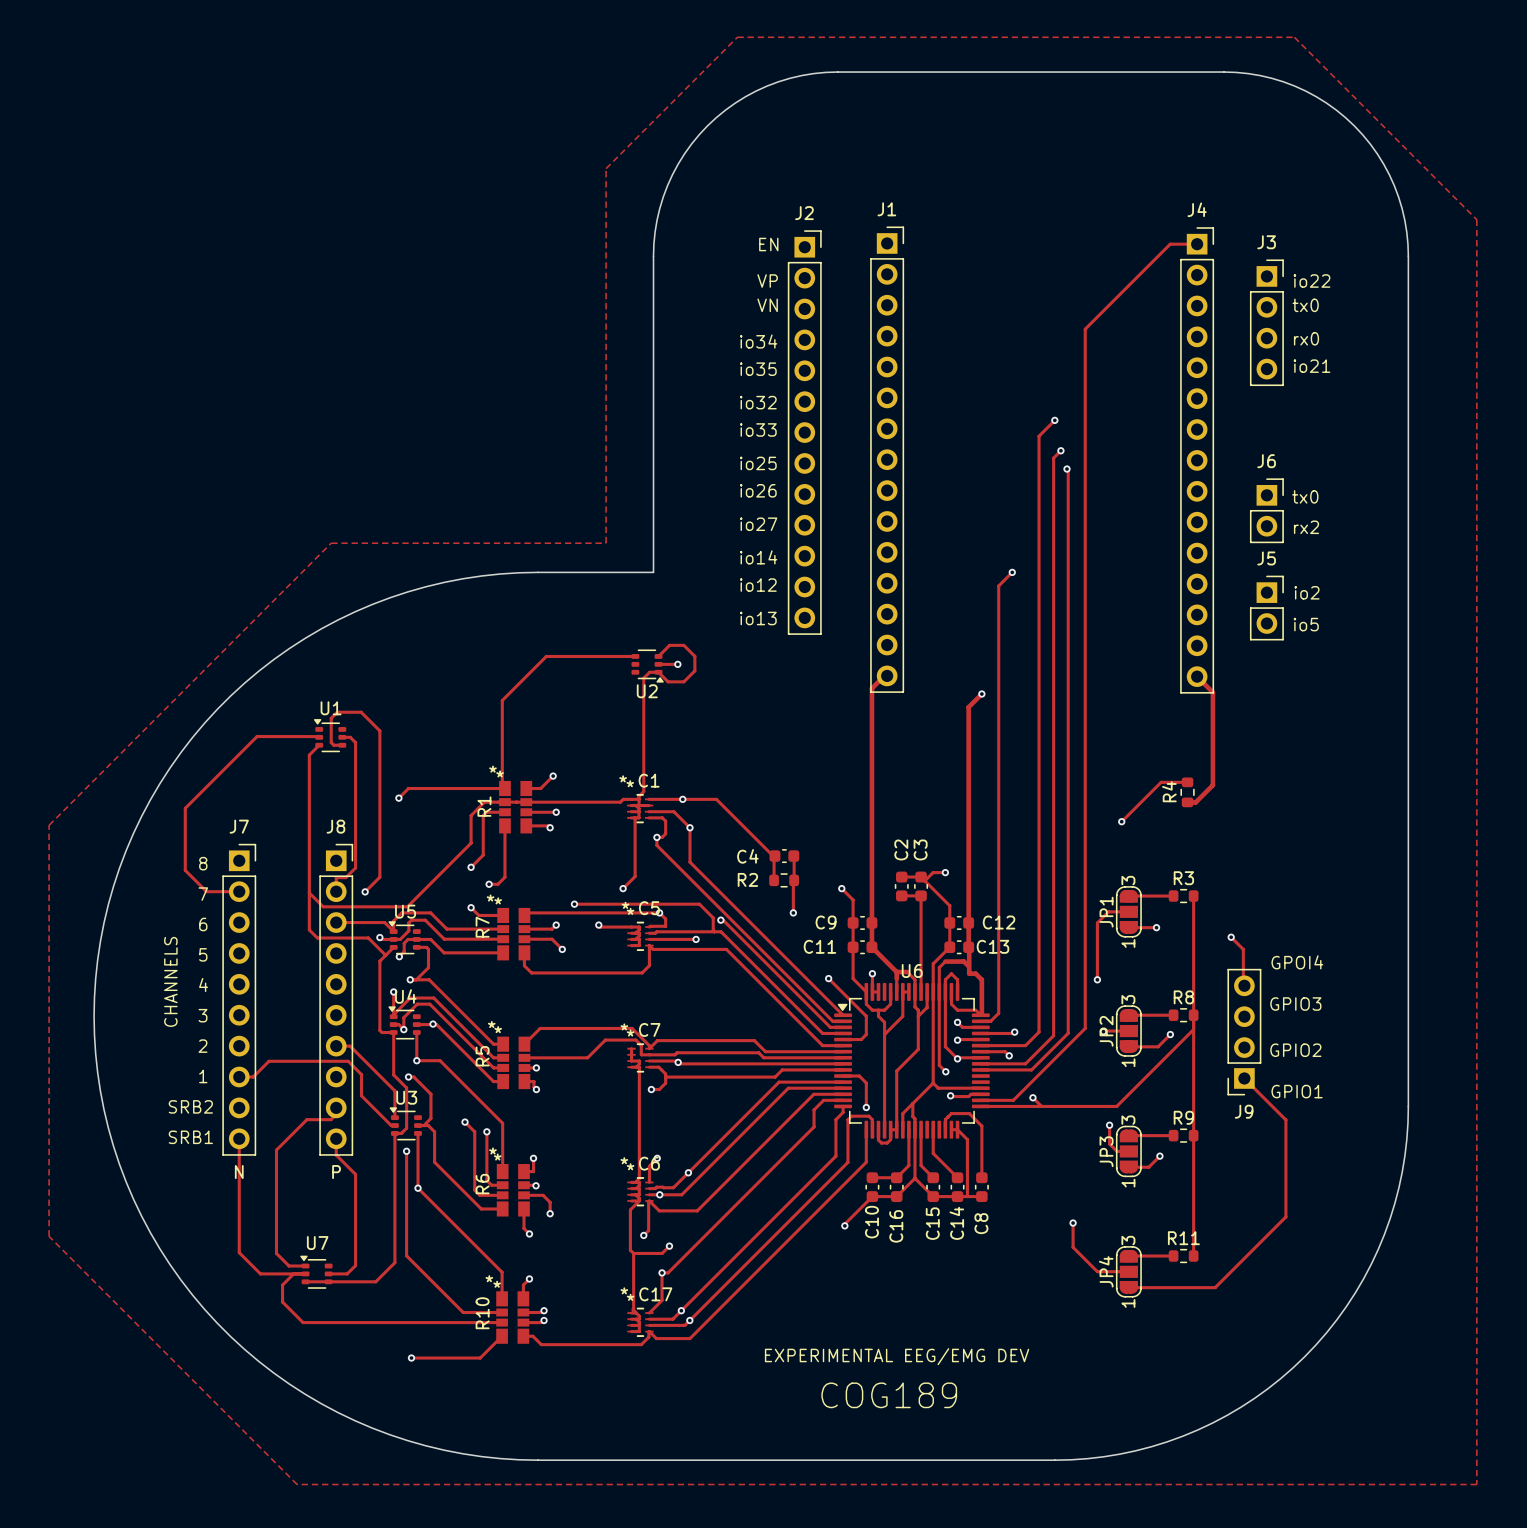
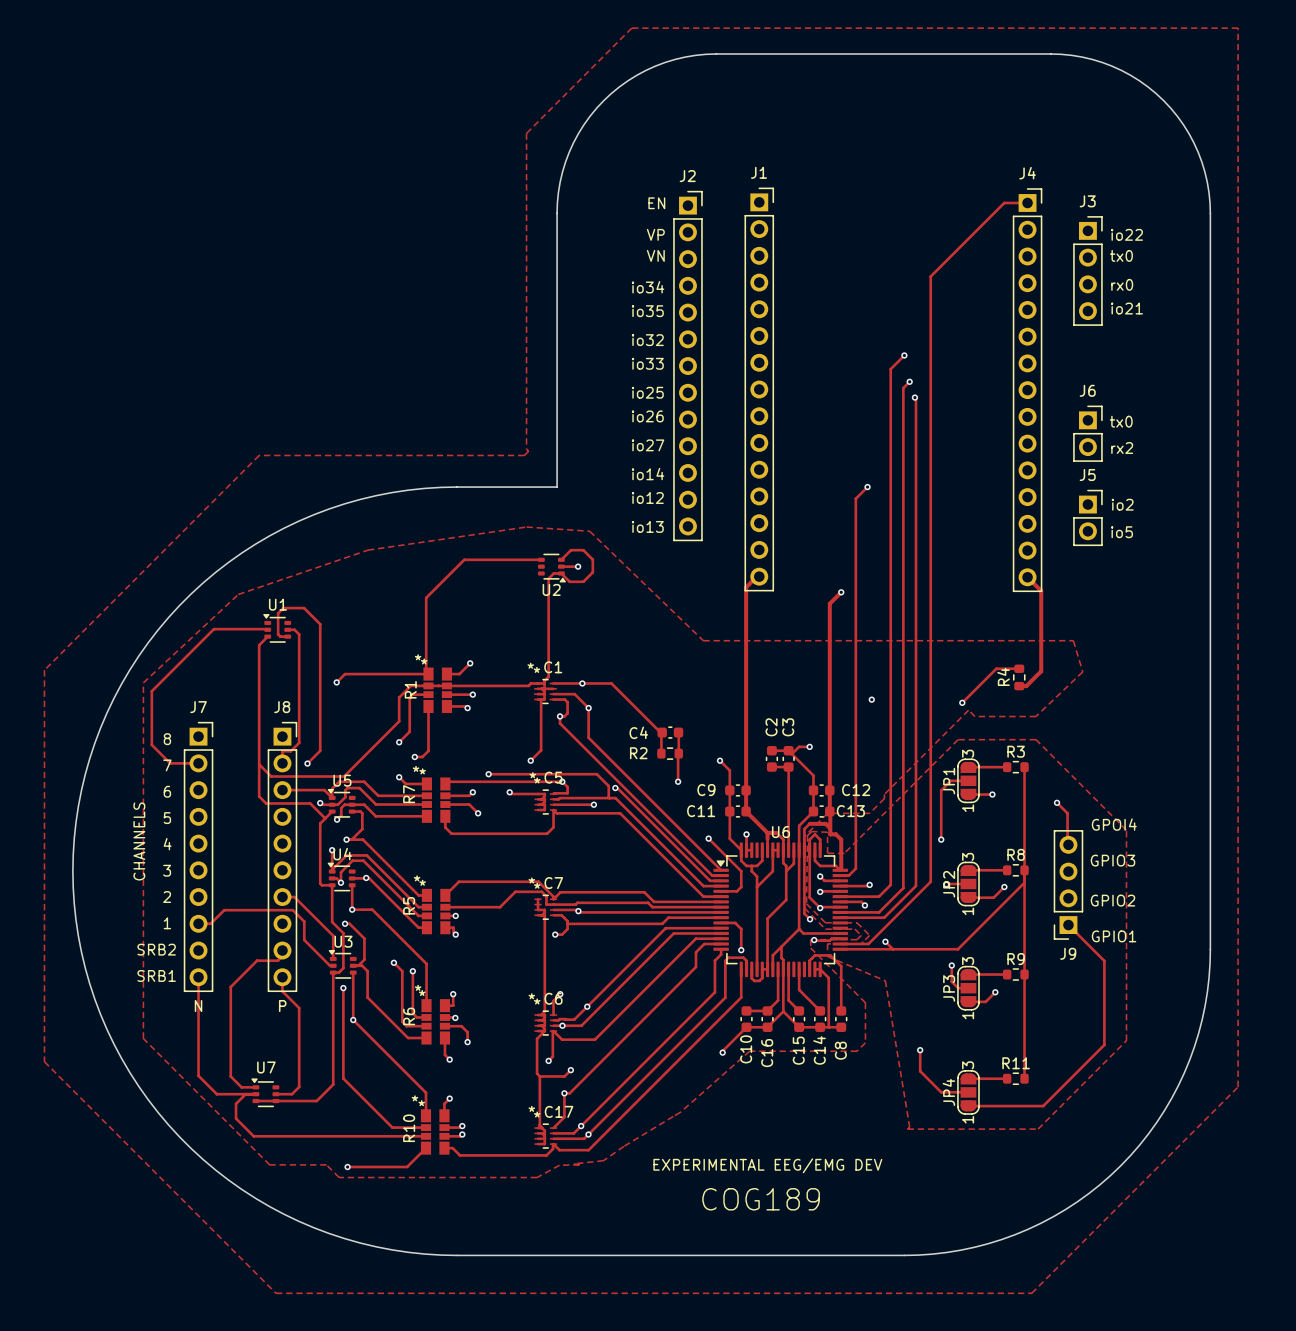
zone outline: (737, 37) (606, 168) (606, 543) (331, 543) (49, 825) (49, 1236) (297, 1484) (1476, 1484) (1476, 219) (1294, 37) (737, 37) -> (631, 28) (526, 133) (526, 449) (528, 451) (524, 455) (259, 455) (44, 670) (44, 1061) (276, 1293) (1031, 1293) (1238, 1087) (1238, 28) (631, 28)
zone outline: none -> (526, 527) (368, 550) (238, 594) (143, 682) (143, 1038) (269, 1164) (326, 1164) (339, 1177) (537, 1177) (559, 1165) (579, 1164) (573, 1163) (603, 1160) (680, 1112) (749, 1051) (857, 1051) (865, 1042) (865, 1002) (810, 948) (810, 939) (857, 939) (861, 935) (854, 929) (825, 929) (804, 908) (804, 836) (827, 813) (869, 813) (884, 798) (884, 794) (968, 710) (974, 716) (1035, 716) (1082, 671) (1073, 640) (703, 640) (589, 531) (526, 527)
via: none -> (871, 699)
zone outline: none -> (958, 739) (1035, 739) (1126, 830) (1126, 1040) (1038, 1129) (907, 1129) (909, 1127) (885, 980) (827, 956) (827, 943) (861, 943) (869, 935) (857, 922) (825, 922) (806, 903) (807, 835) (812, 831) (827, 832) (827, 853) (844, 853) (958, 739)

